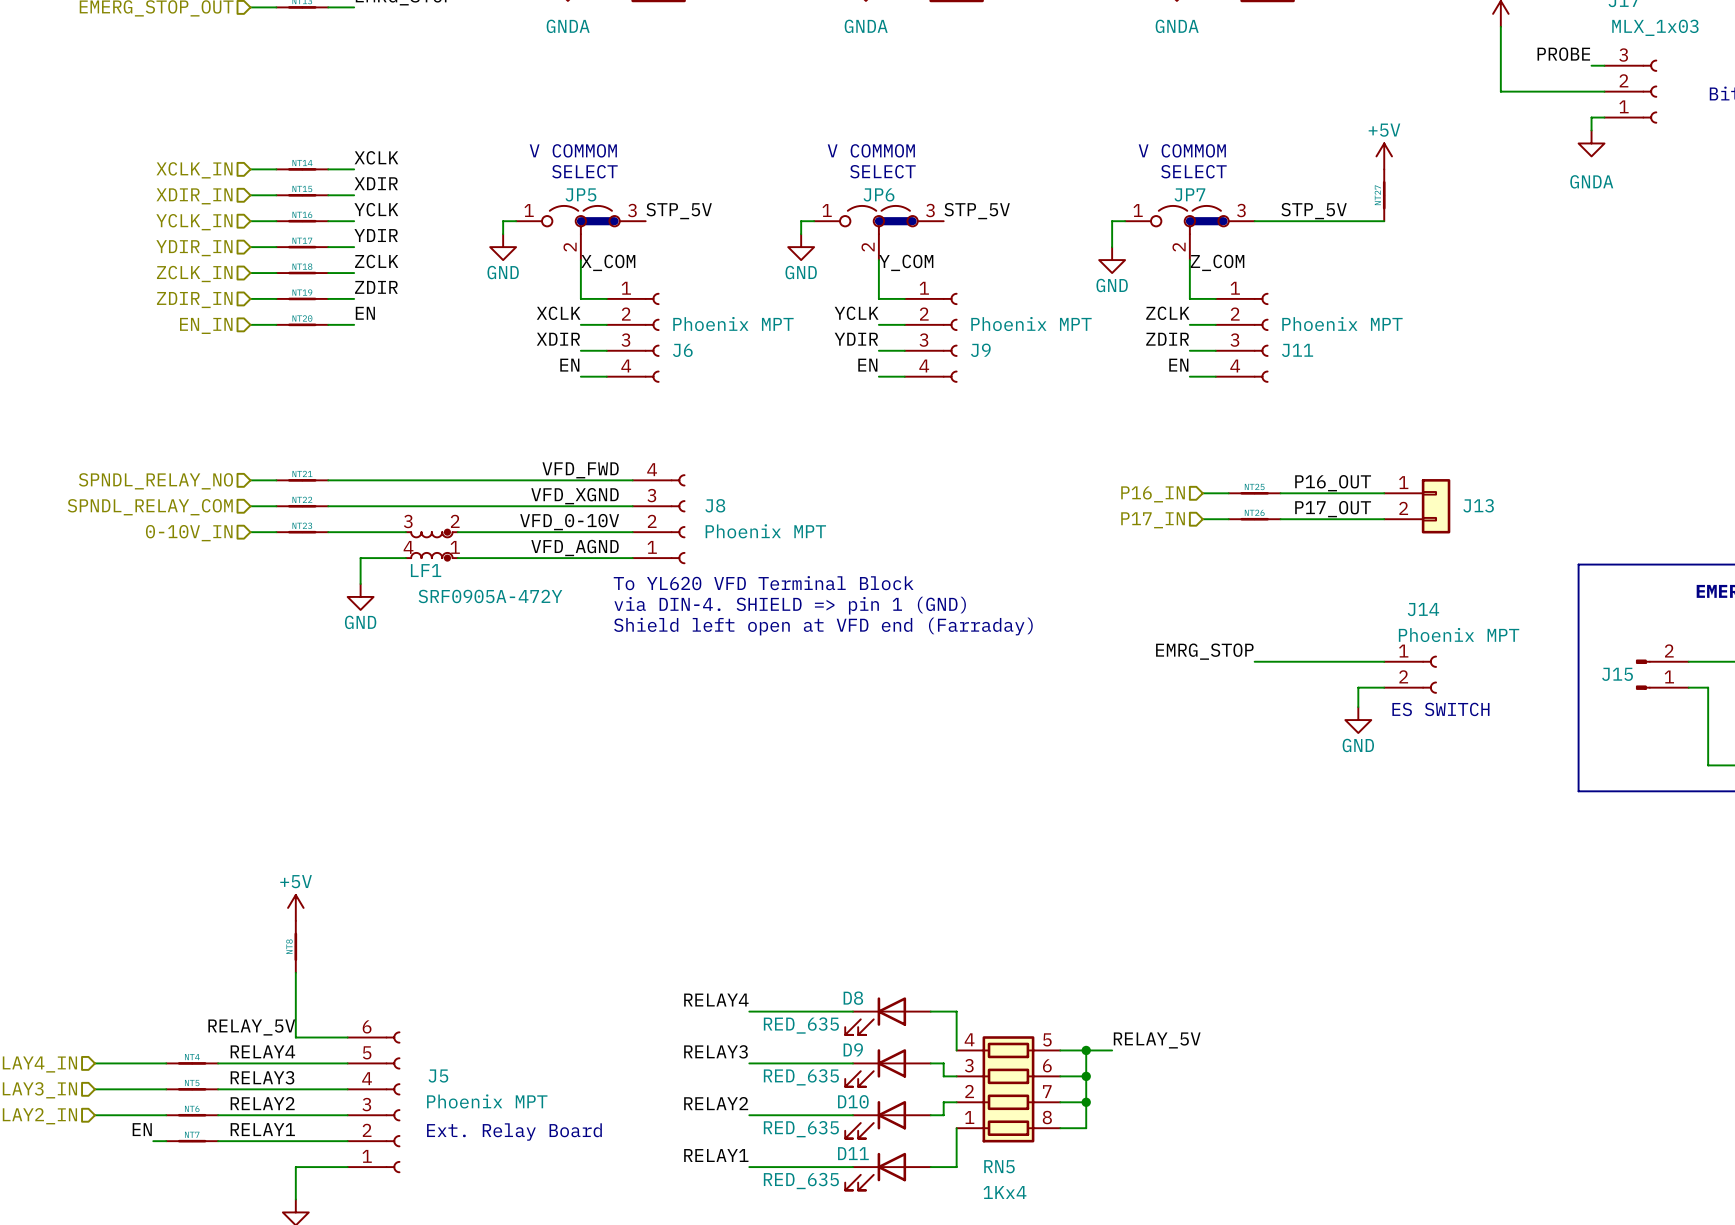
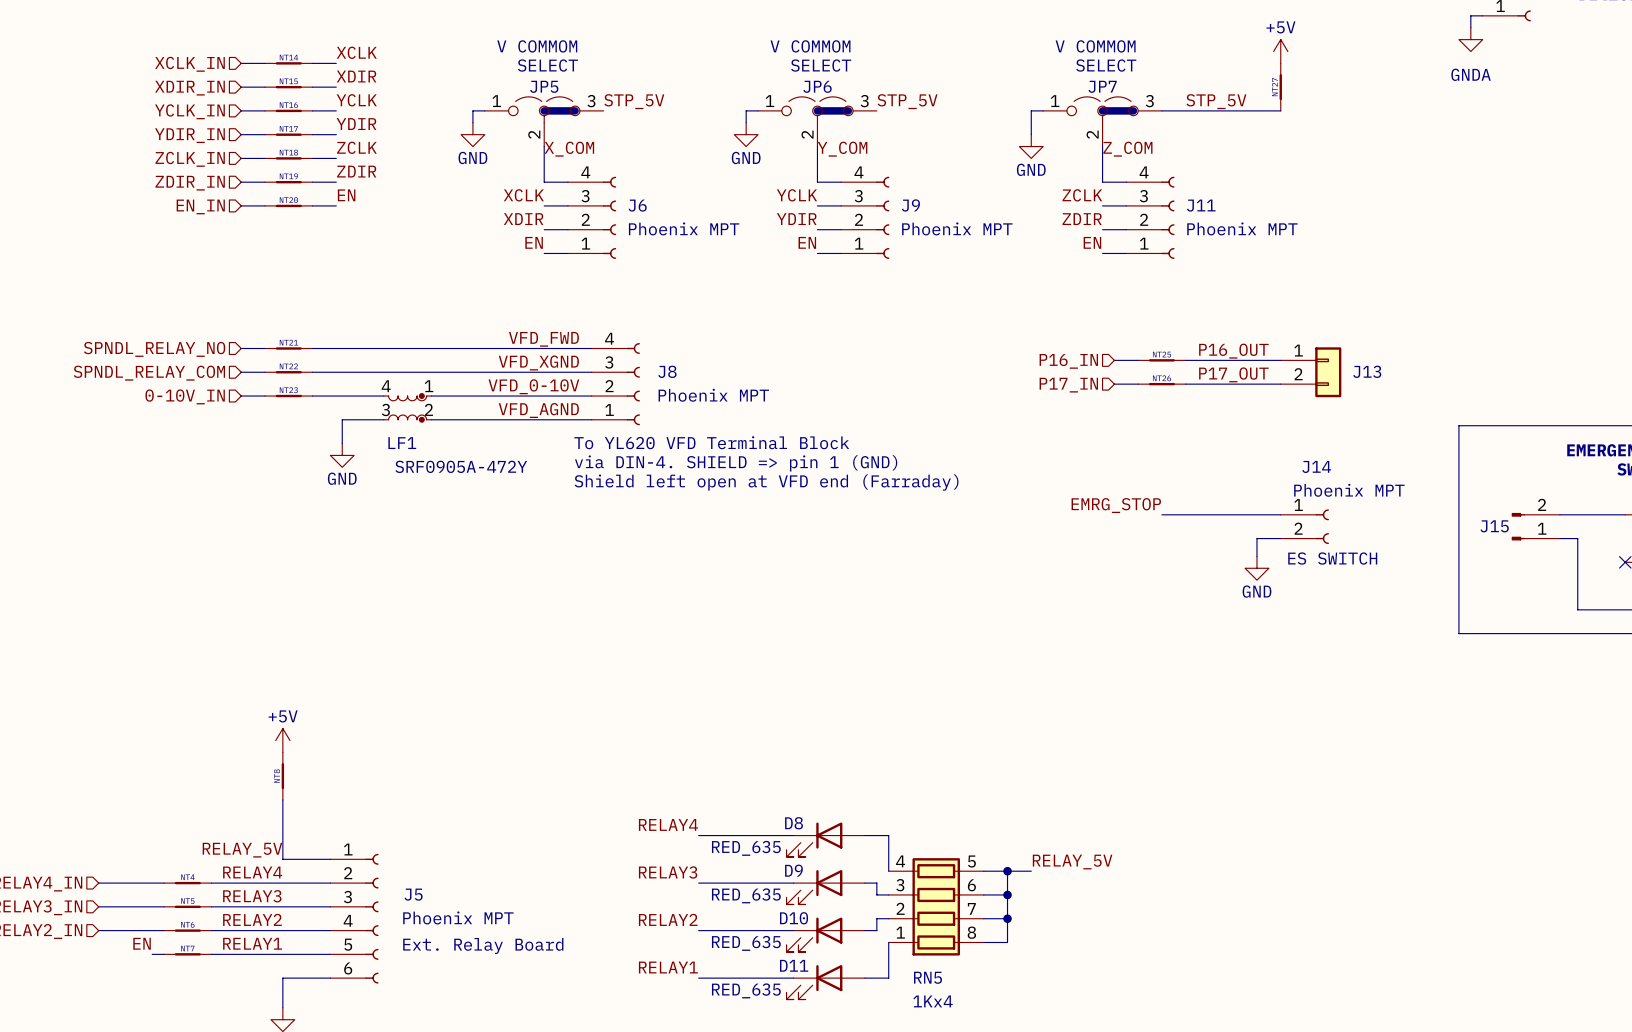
J6 flip: as is (652, 337) -> up-down (609, 217)
J9 flip: as is (950, 337) -> up-down (882, 217)
J11 flip: as is (1261, 337) -> up-down (1167, 217)
LF1 flip: as is (431, 545) -> up-down (407, 407)
J5 flip: as is (393, 1102) -> up-down (371, 918)

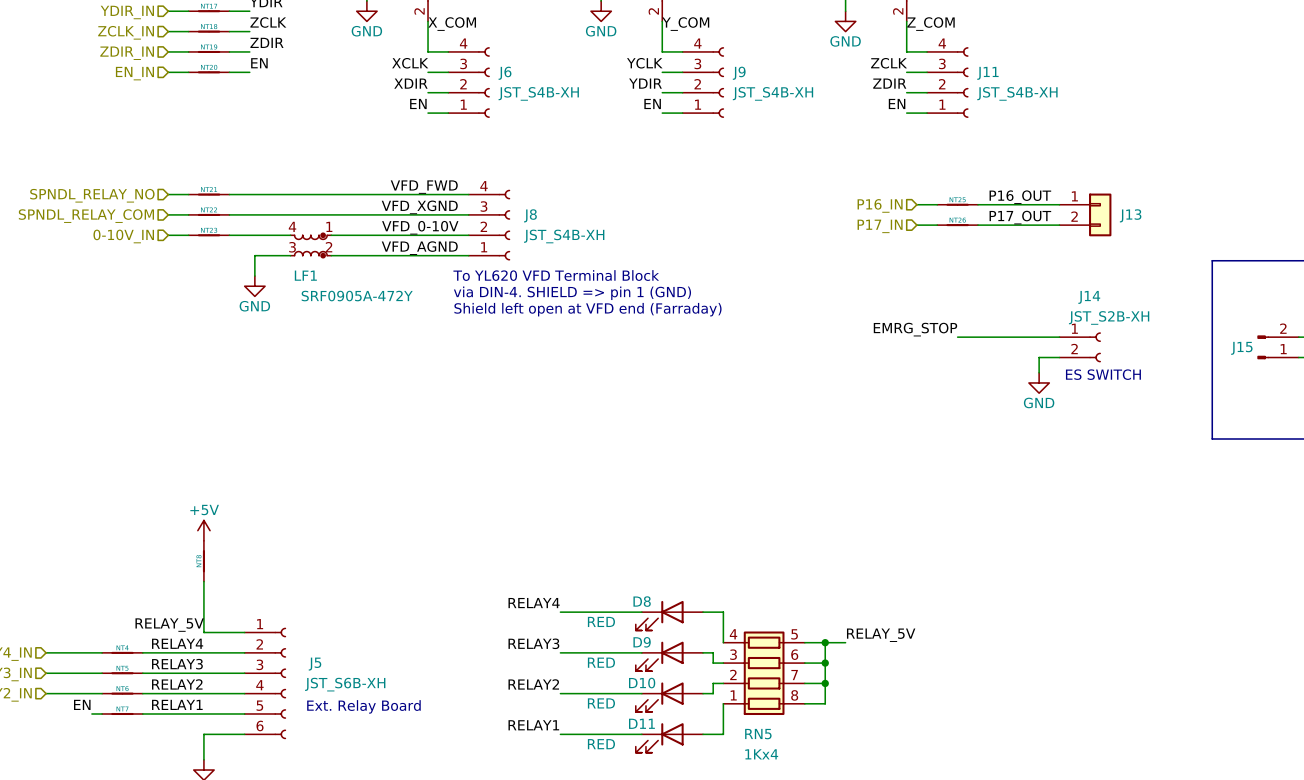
J6 value: Phoenix MPT (684, 228) -> JST_S4B-XH (538, 93)
J9 value: Phoenix MPT (957, 228) -> JST_S4B-XH (773, 93)
J11 value: Phoenix MPT (1242, 228) -> JST_S4B-XH (1017, 93)
J8 value: Phoenix MPT (713, 395) -> JST_S4B-XH (564, 236)
J14 value: Phoenix MPT (1349, 490) -> JST_S2B-XH (1109, 317)
D8 value: RED_635 (746, 848) -> RED (601, 621)
D9 value: RED_635 (746, 895) -> RED (601, 662)
J5 value: Phoenix MPT (458, 917) -> JST_S6B-XH (345, 684)
D10 value: RED_635 (746, 943) -> RED (601, 703)
D11 value: RED_635 (746, 990) -> RED (601, 744)

